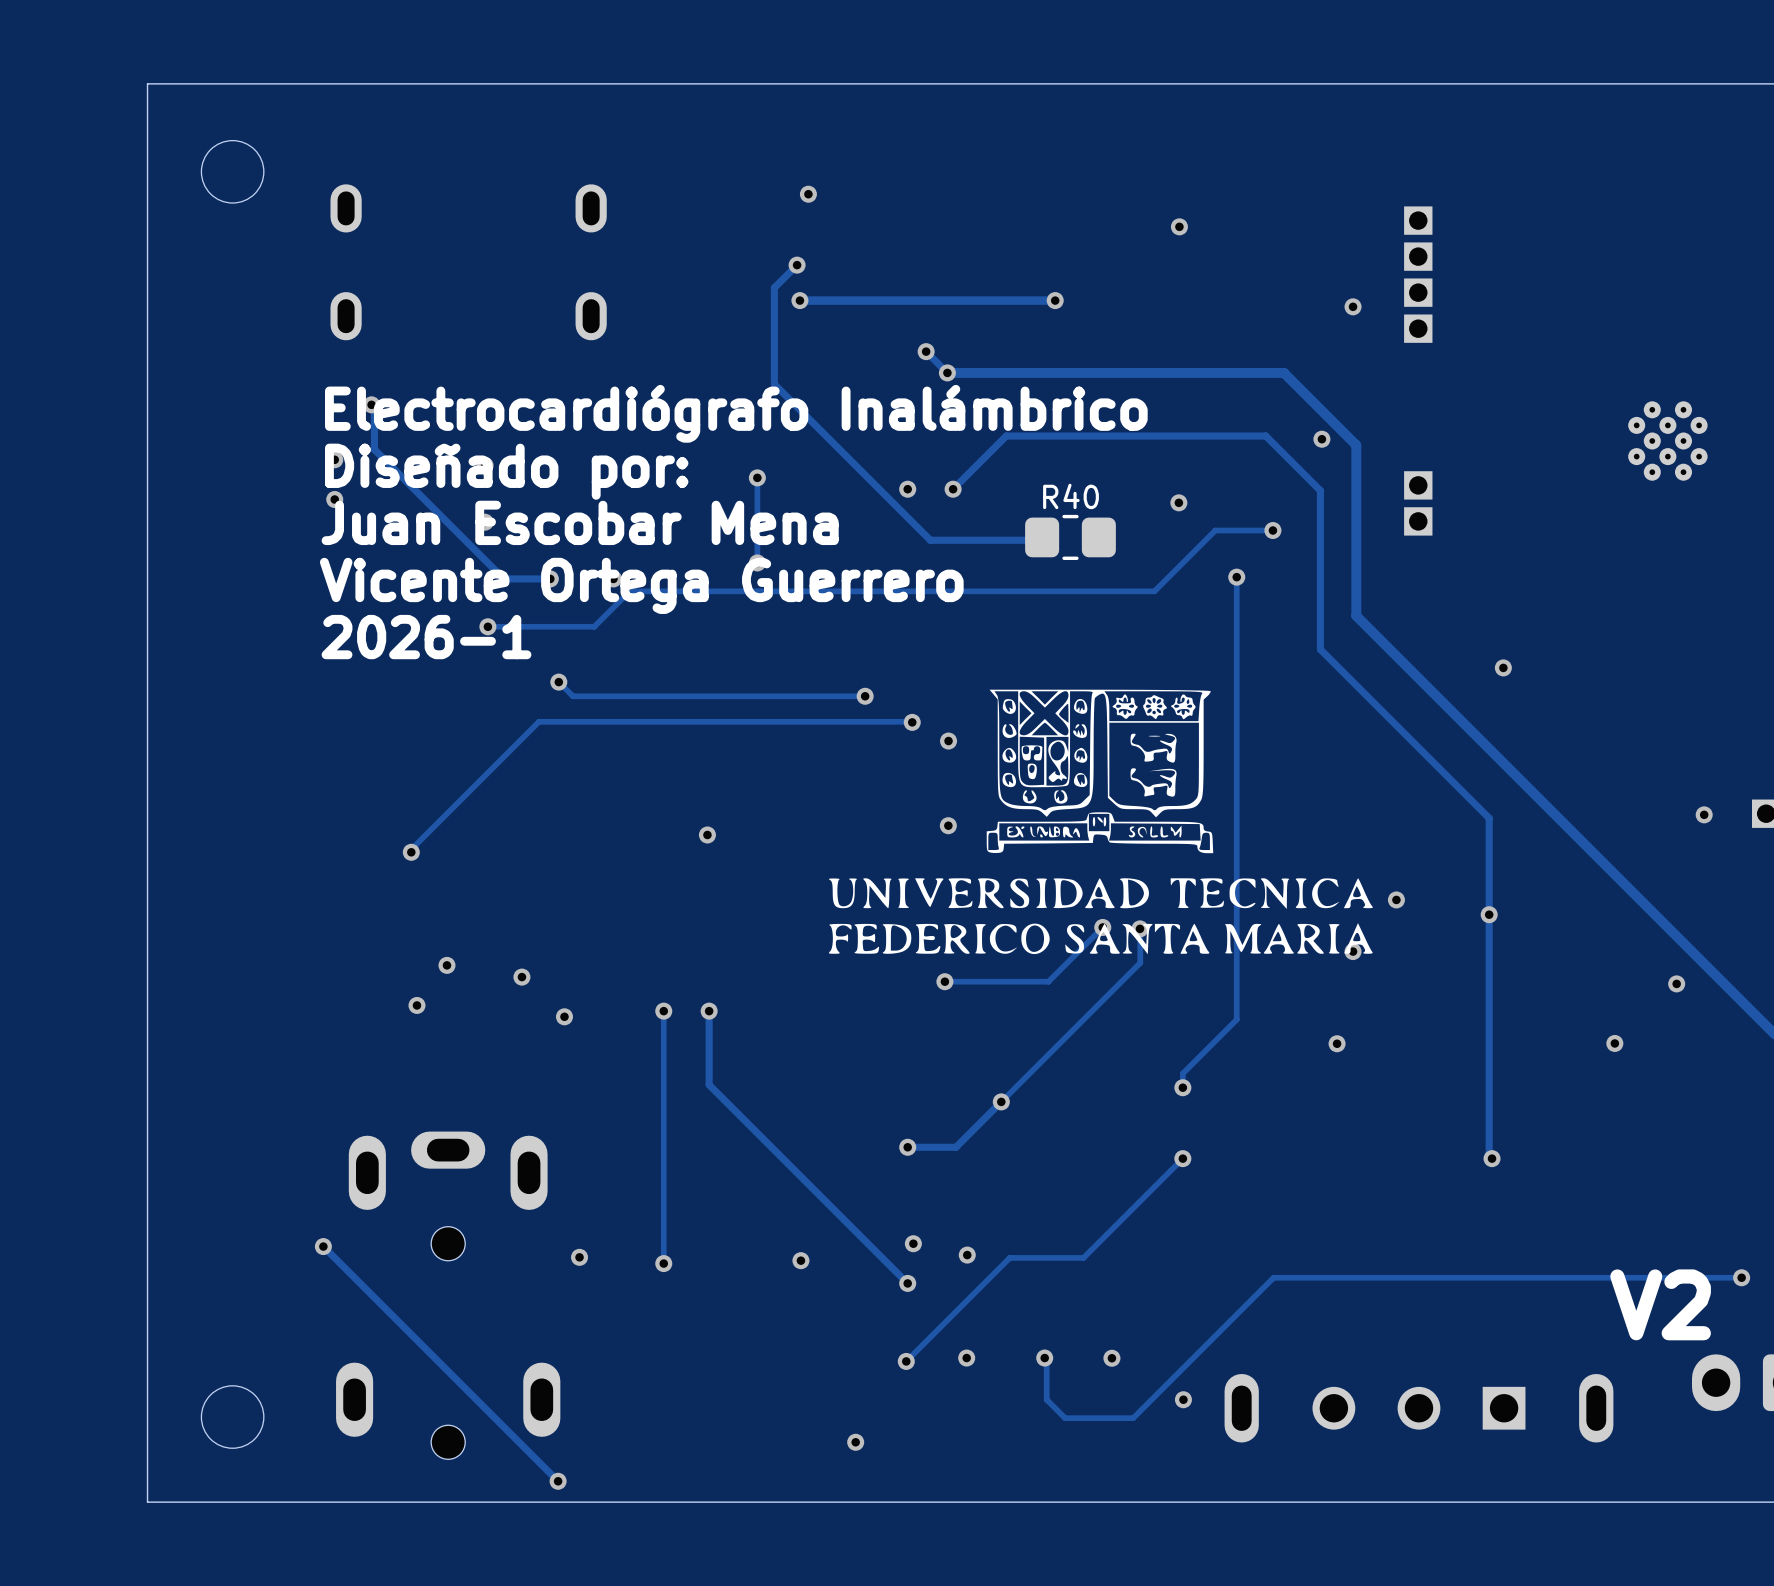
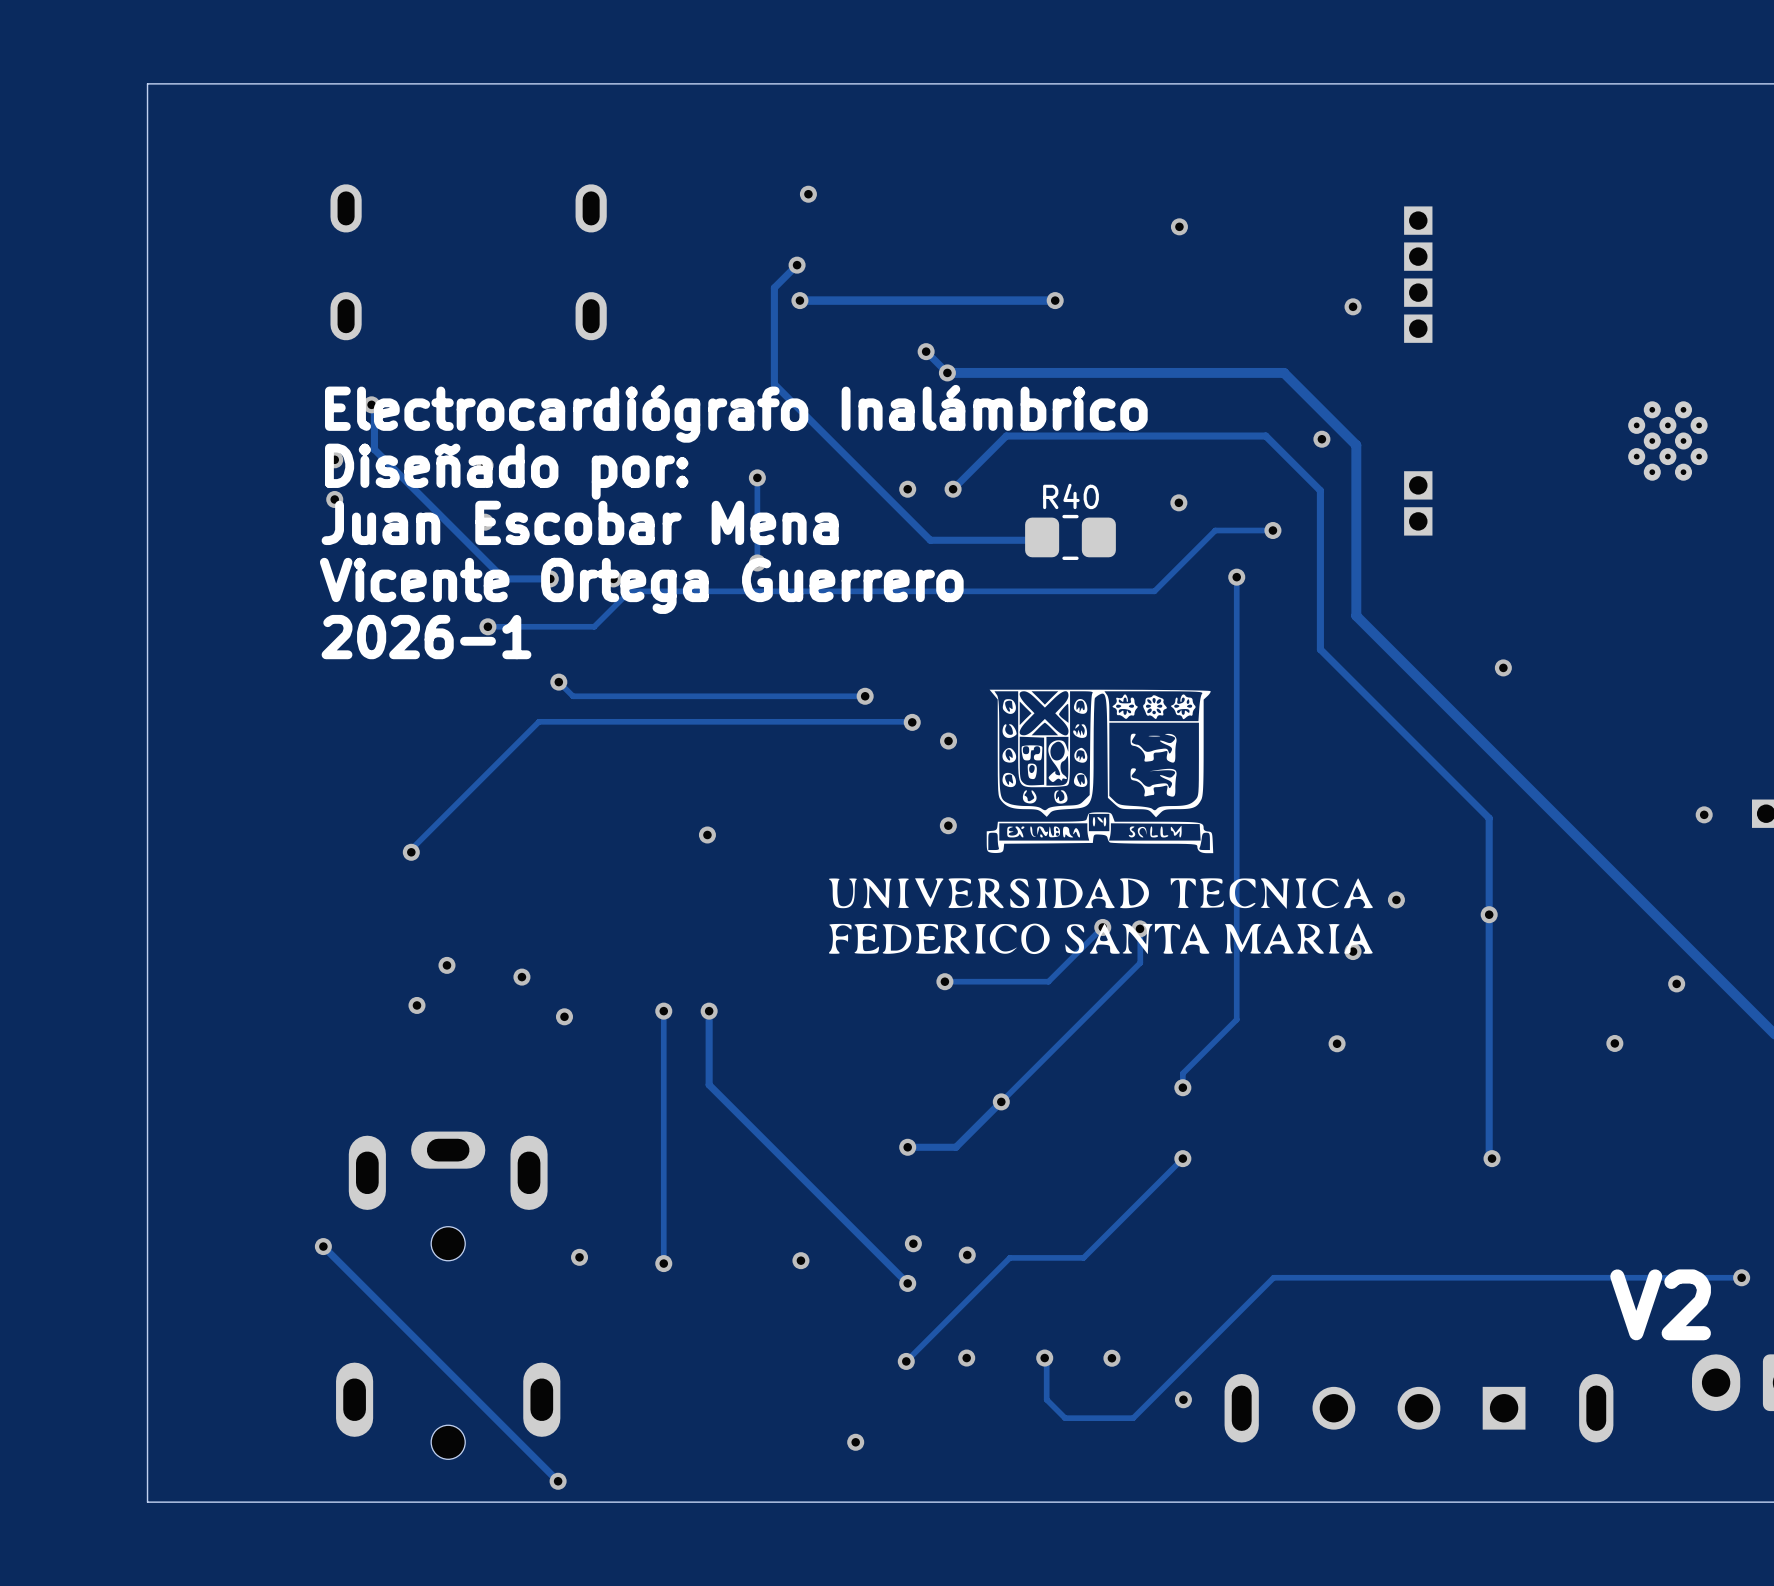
round board edge: [201, 140, 264, 204] -> none
round board edge: [201, 1385, 264, 1449] -> none

